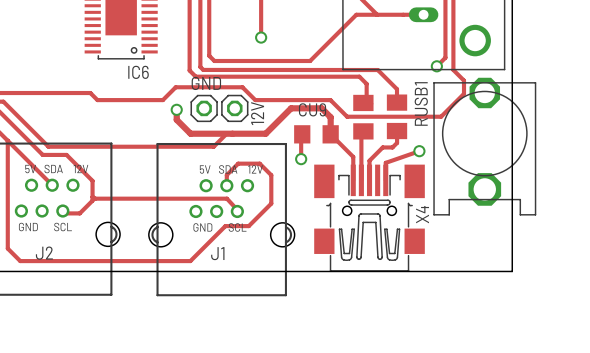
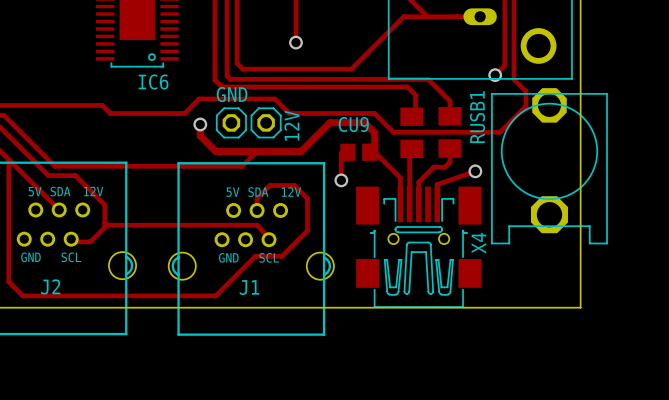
CU9 footprint: [294, 125, 339, 144] -> [340, 143, 378, 161]

